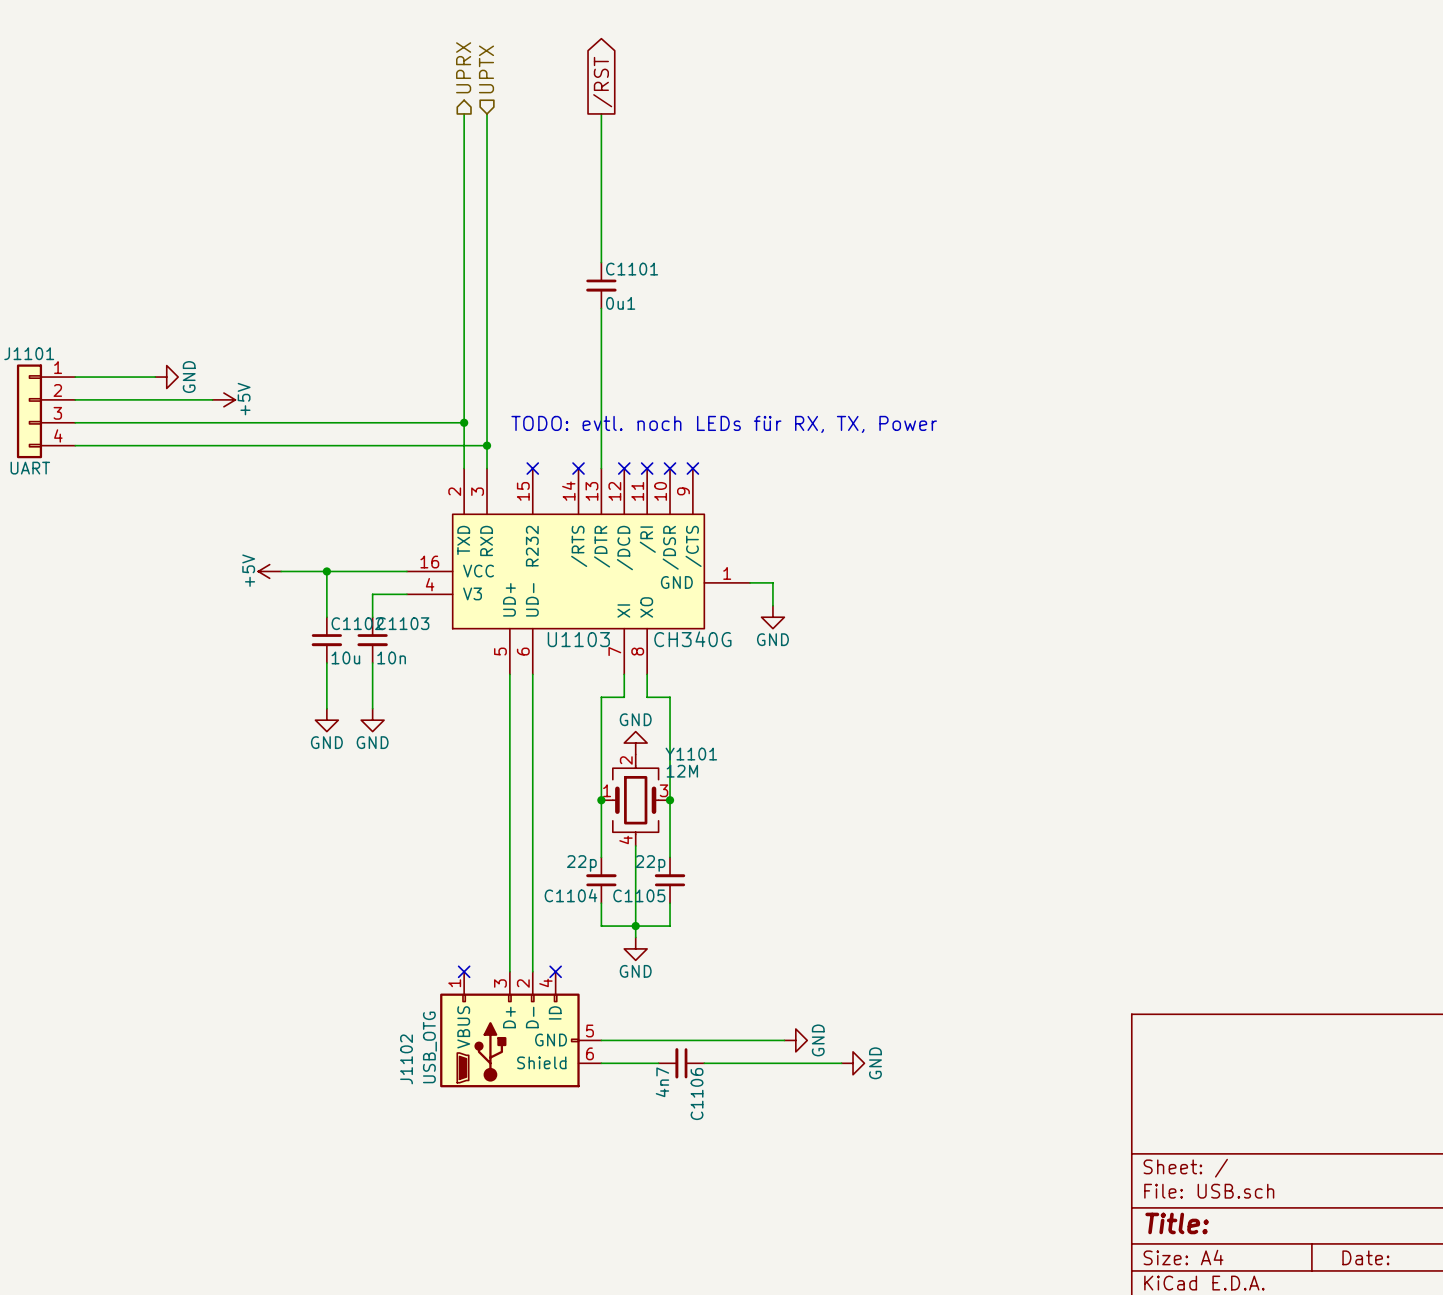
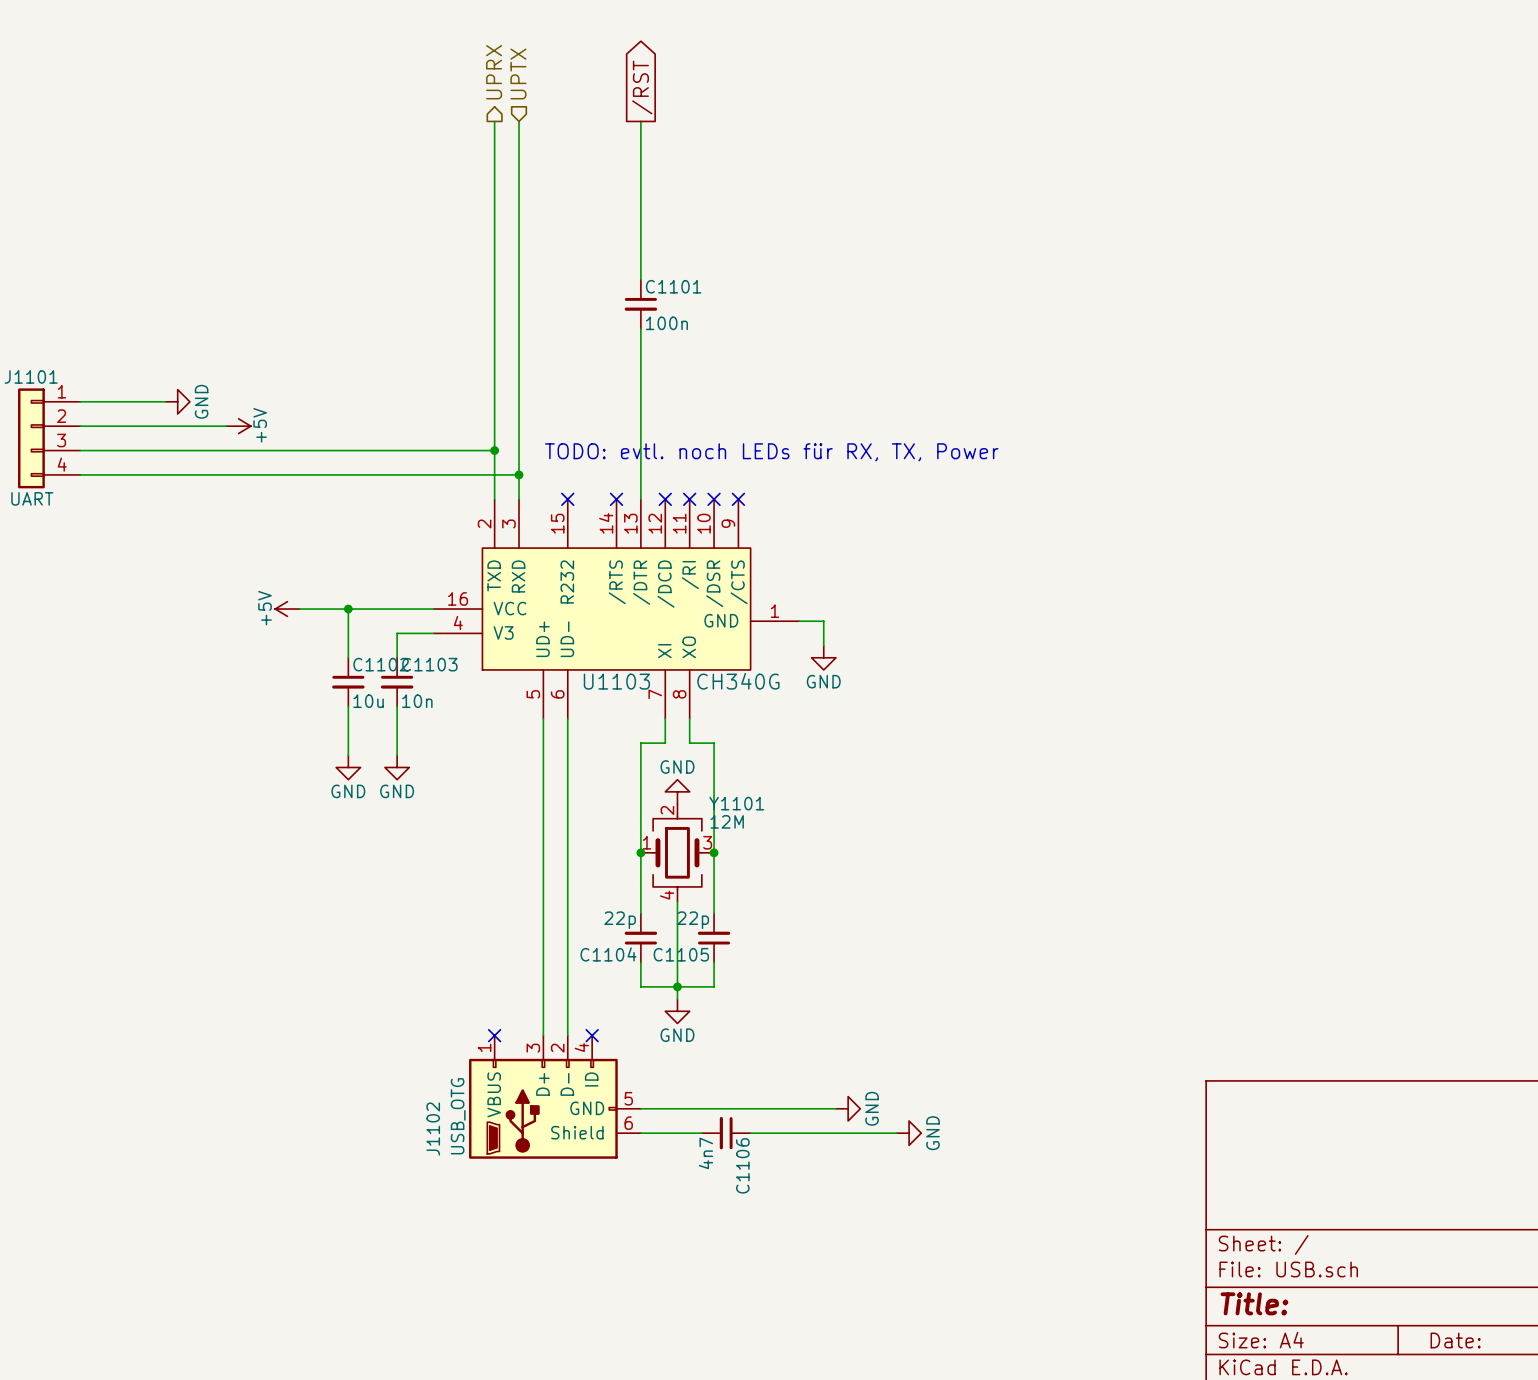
C1101 value: 0u1 (620, 303) -> 100n (666, 323)

